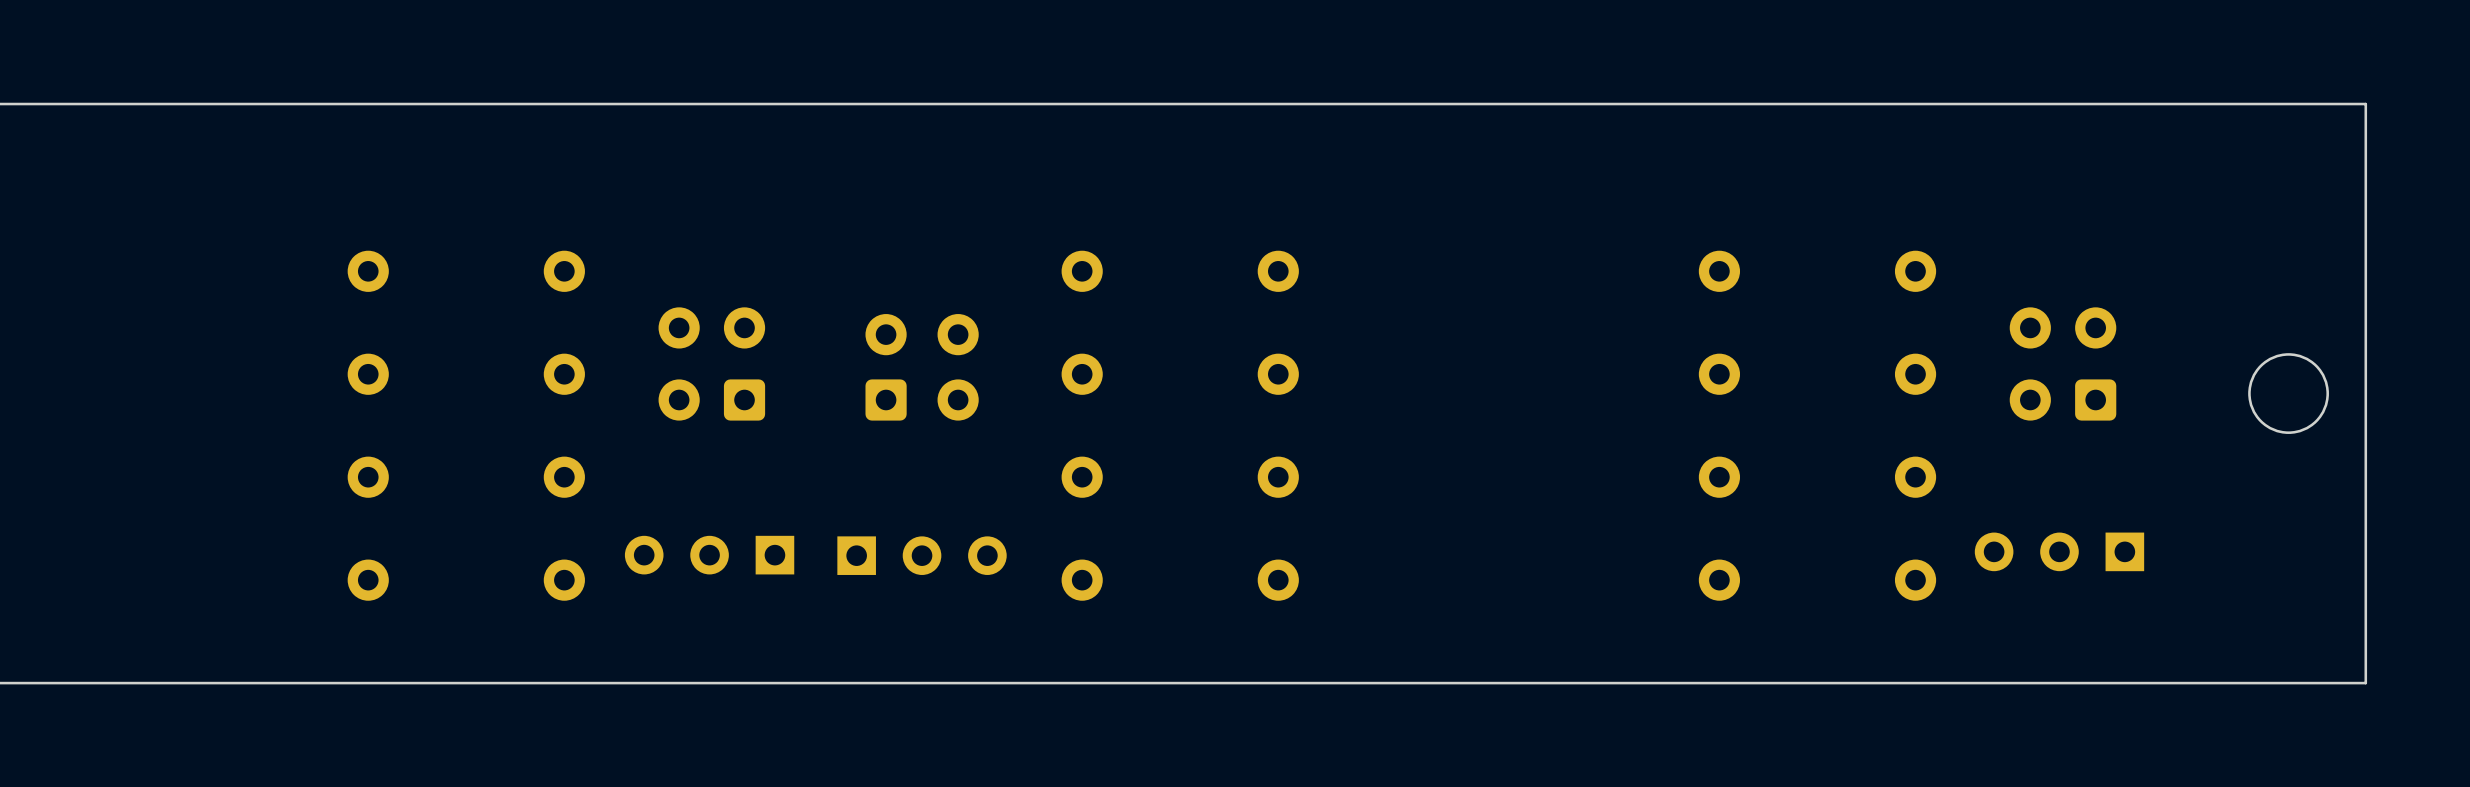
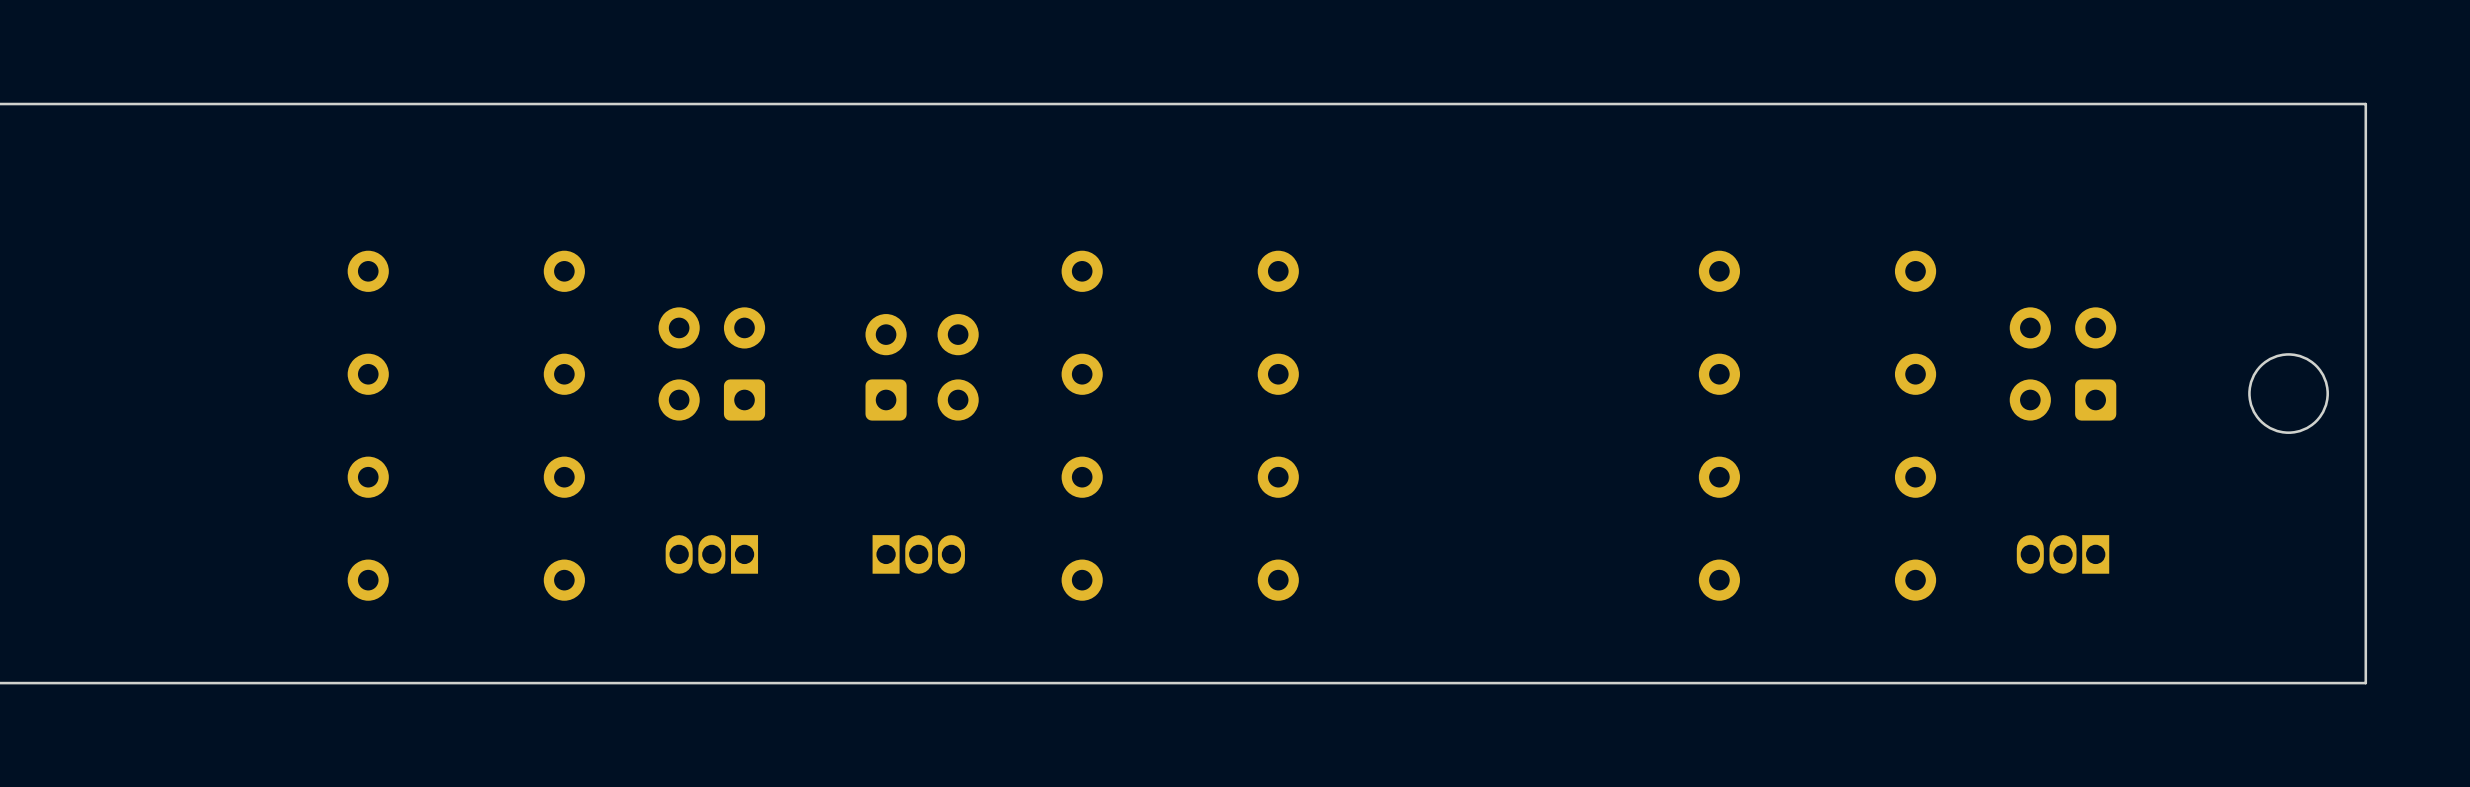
part footprint: [1974, 532, 2145, 572] -> [2016, 535, 2110, 574]
part footprint: [624, 535, 795, 575] -> [665, 535, 759, 574]
part footprint: [837, 536, 1007, 575] -> [872, 535, 965, 574]

